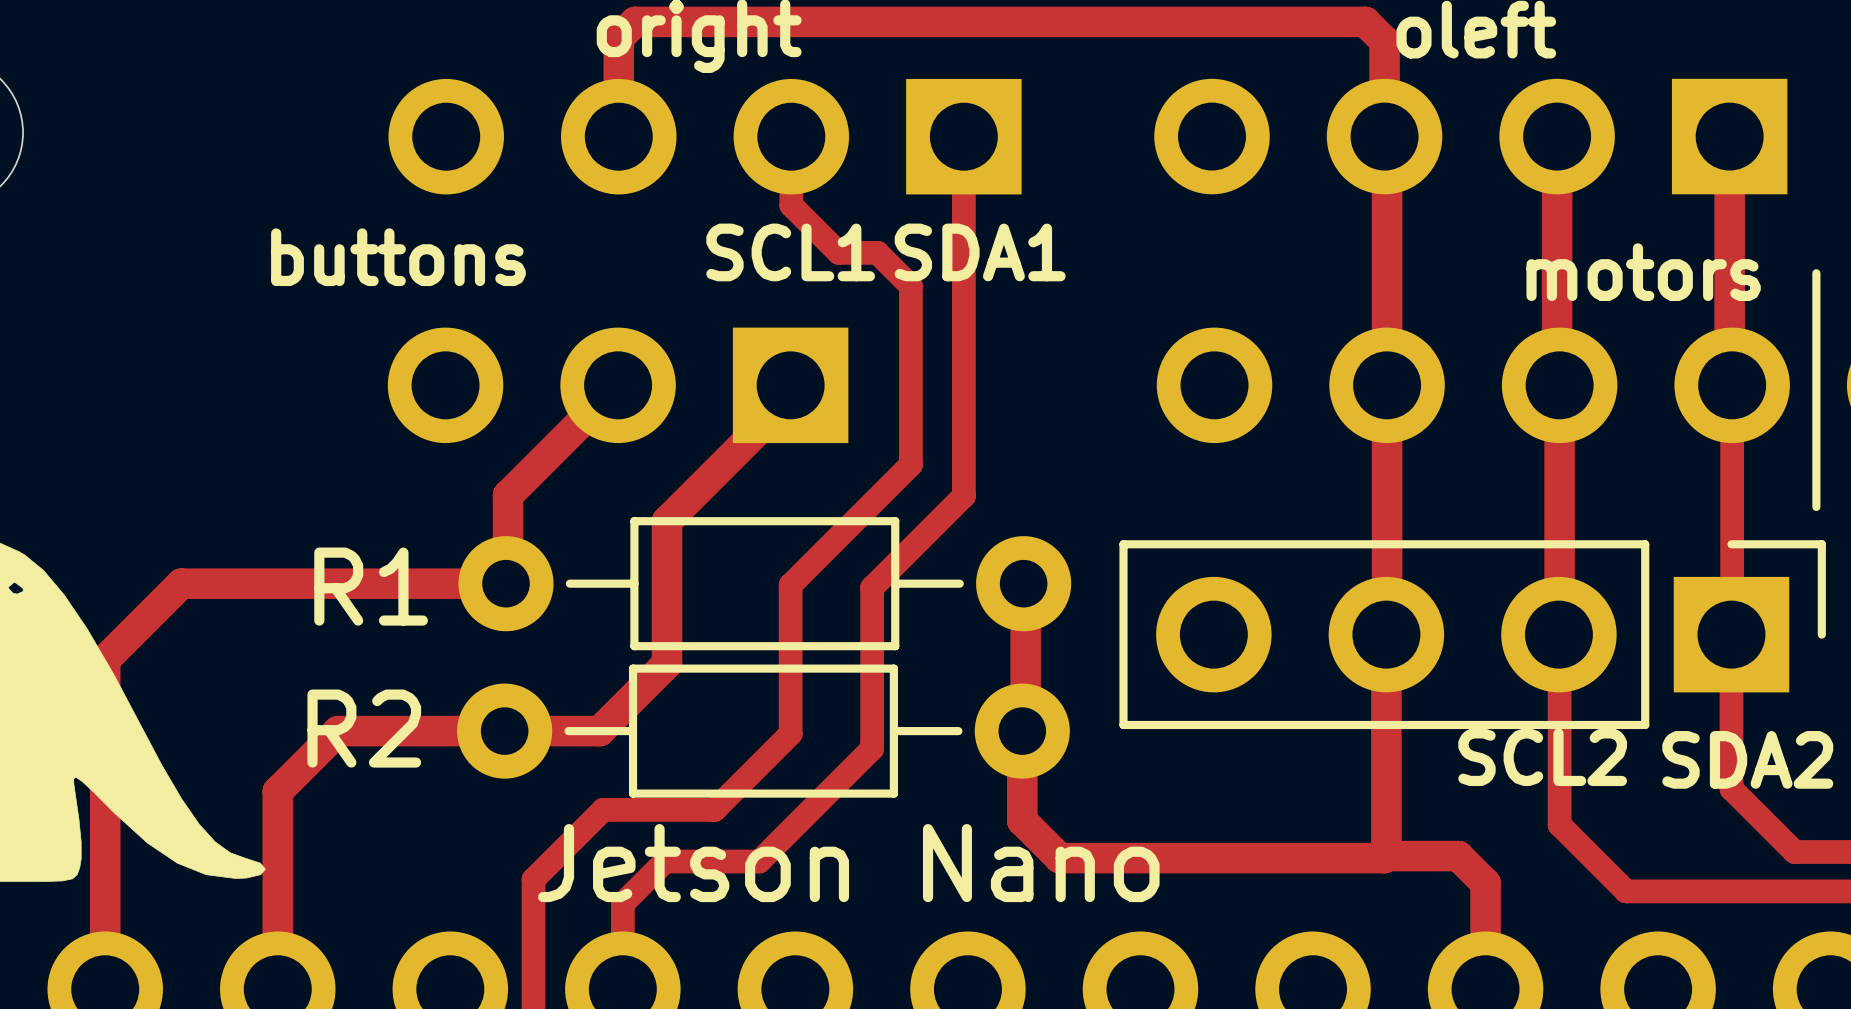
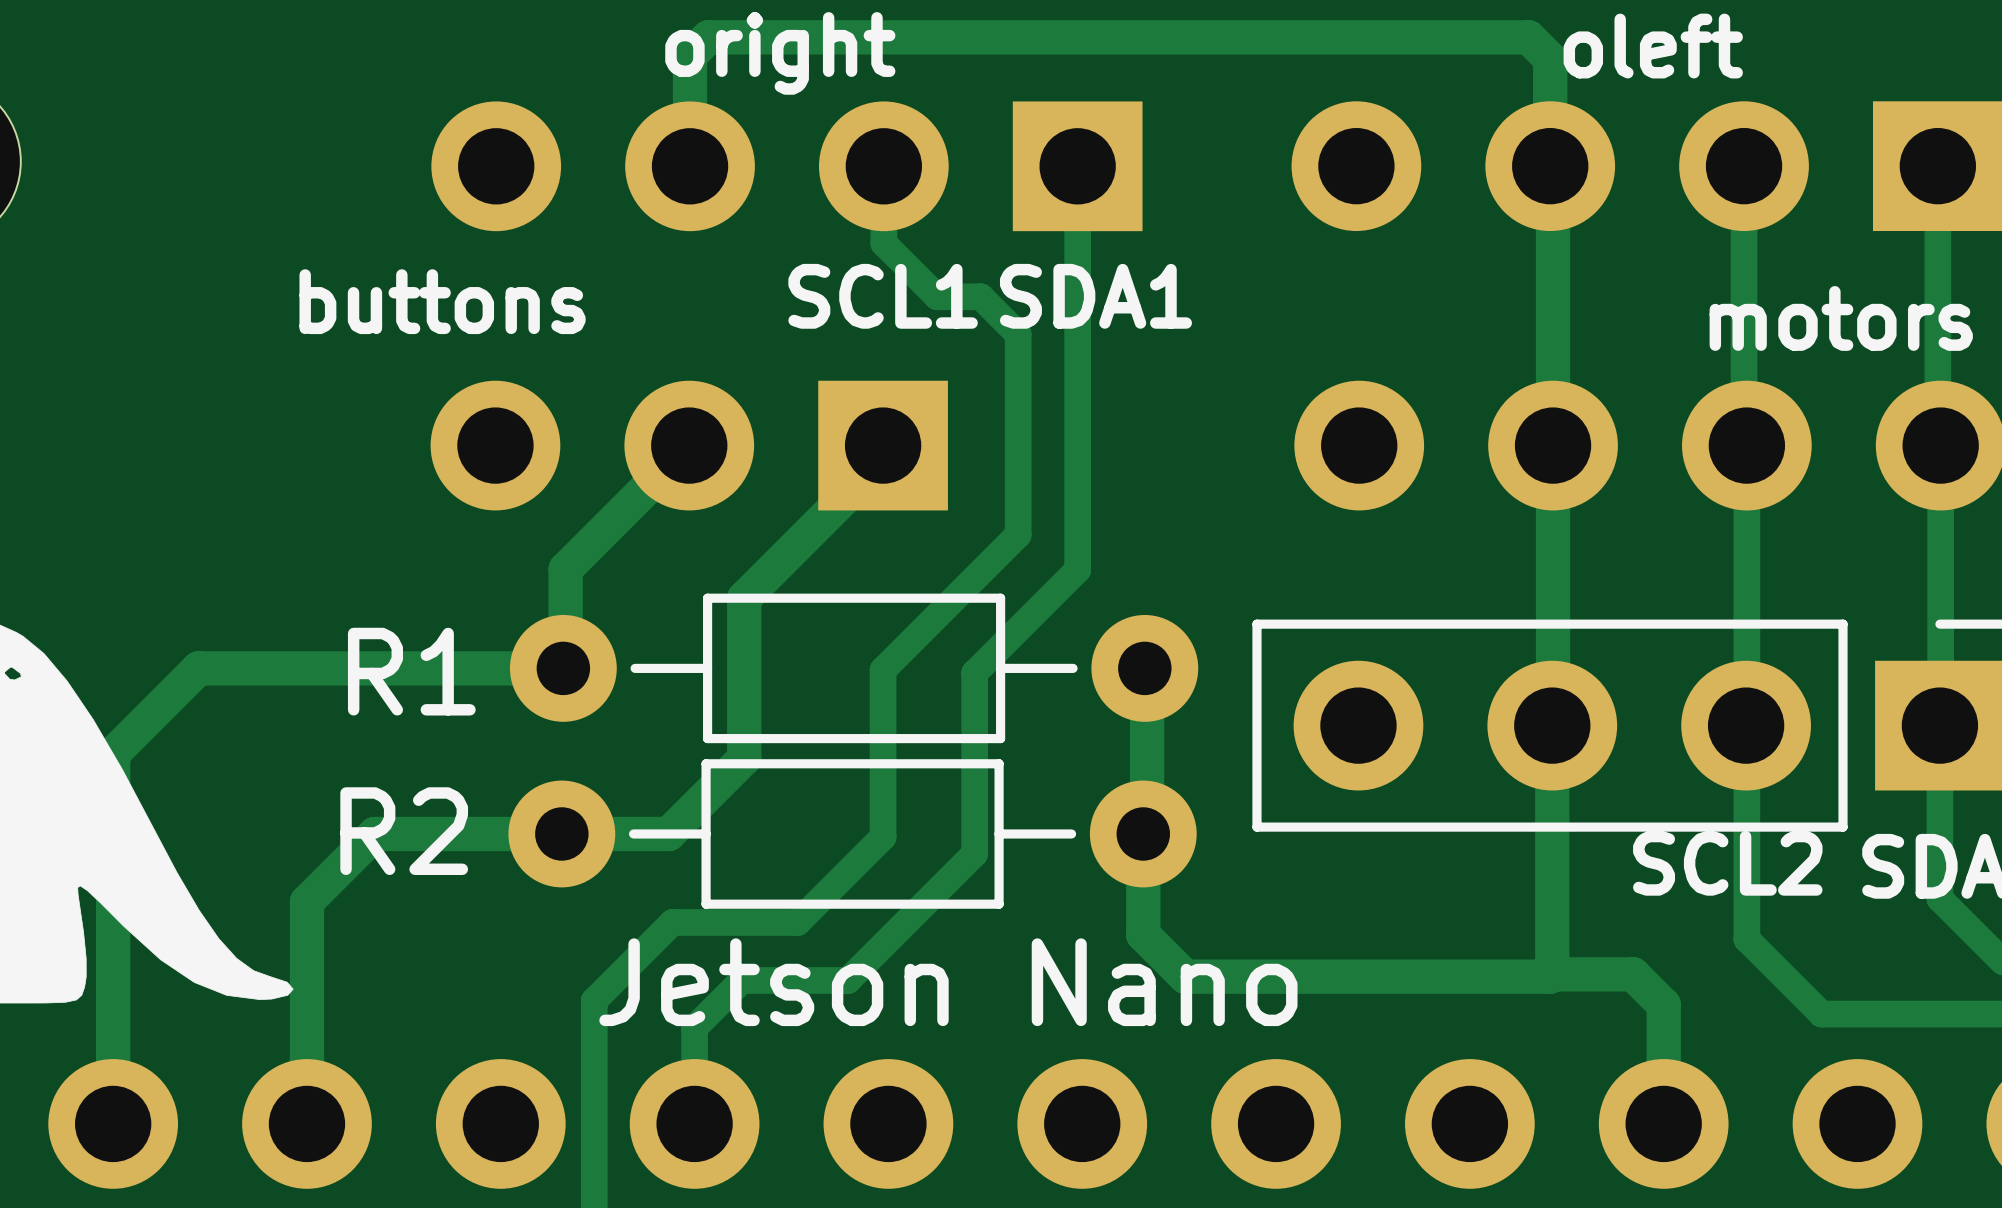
track width: thick (1557, 136) (1557, 382) -> thin (1744, 166) (1744, 442)
track width: thick (1729, 136) (1729, 382) -> thin (1937, 166) (1937, 442)
track width: thick (1559, 385) (1559, 633) -> thin (1746, 445) (1746, 724)

